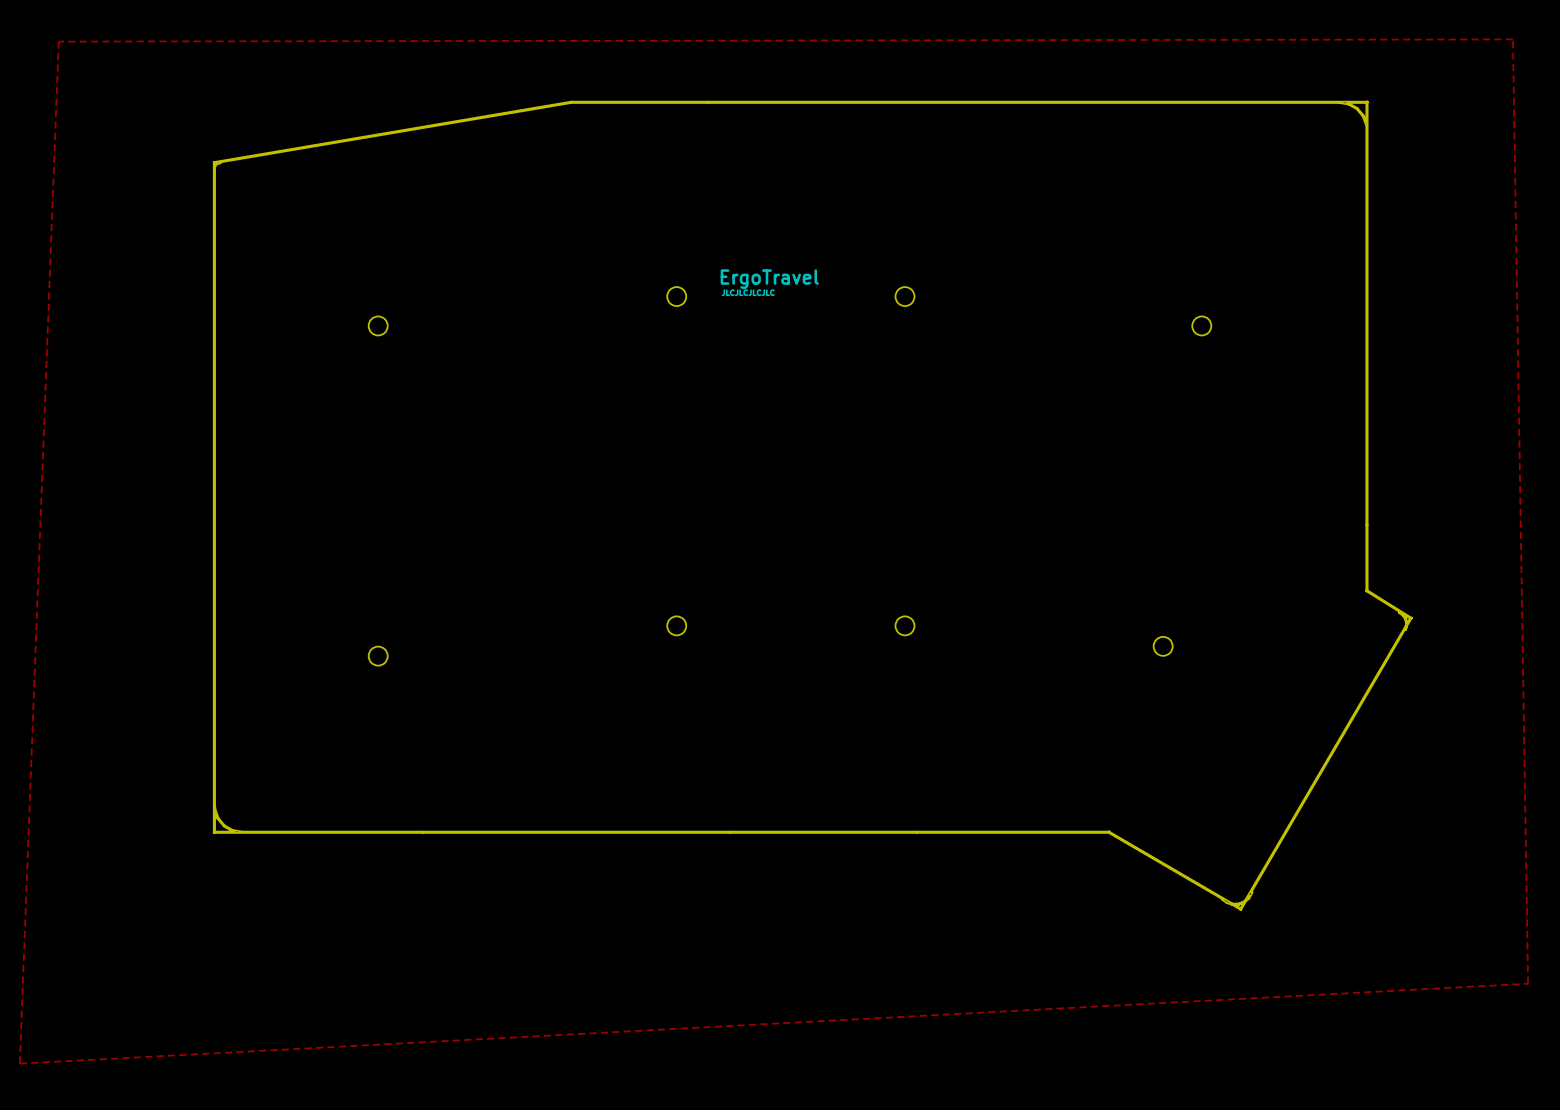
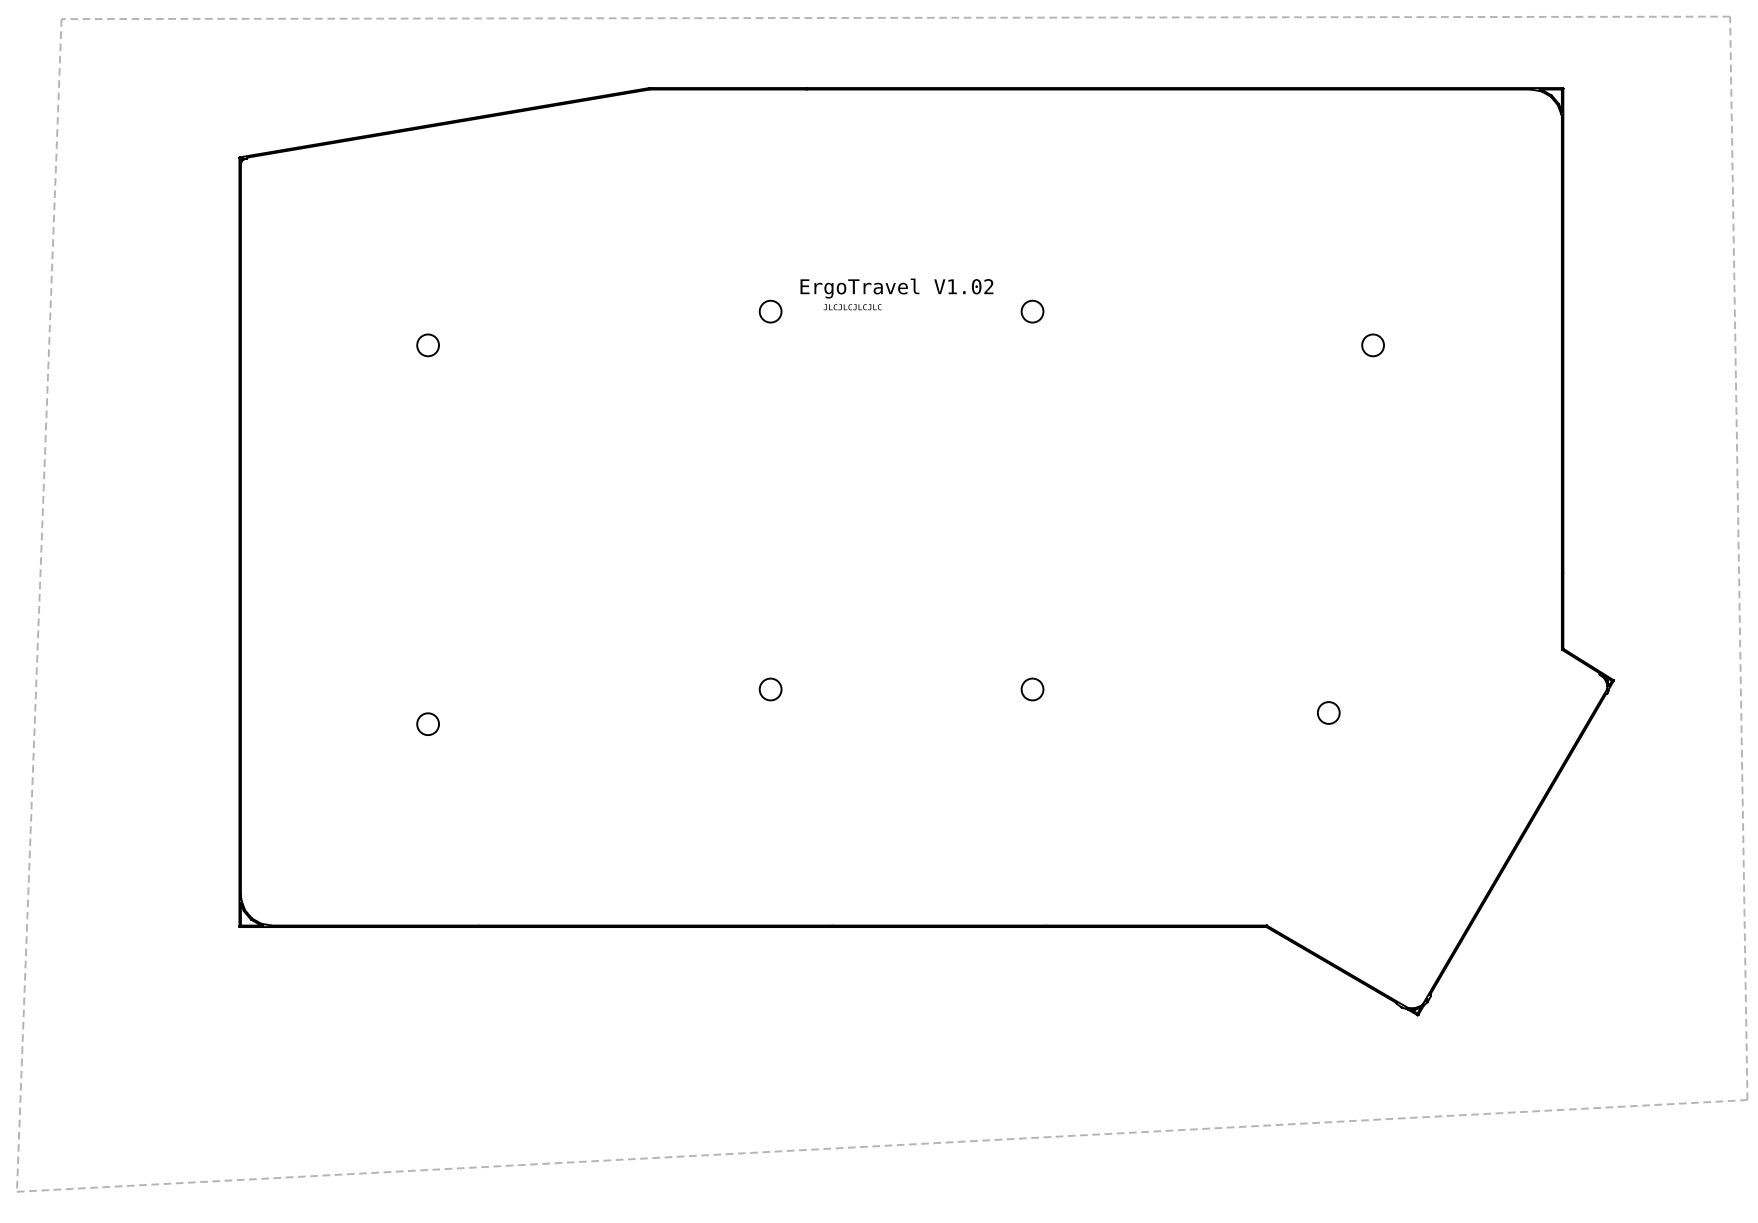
text: ErgoTravel (769, 279) -> ErgoTravel V1.02 (896, 288)

